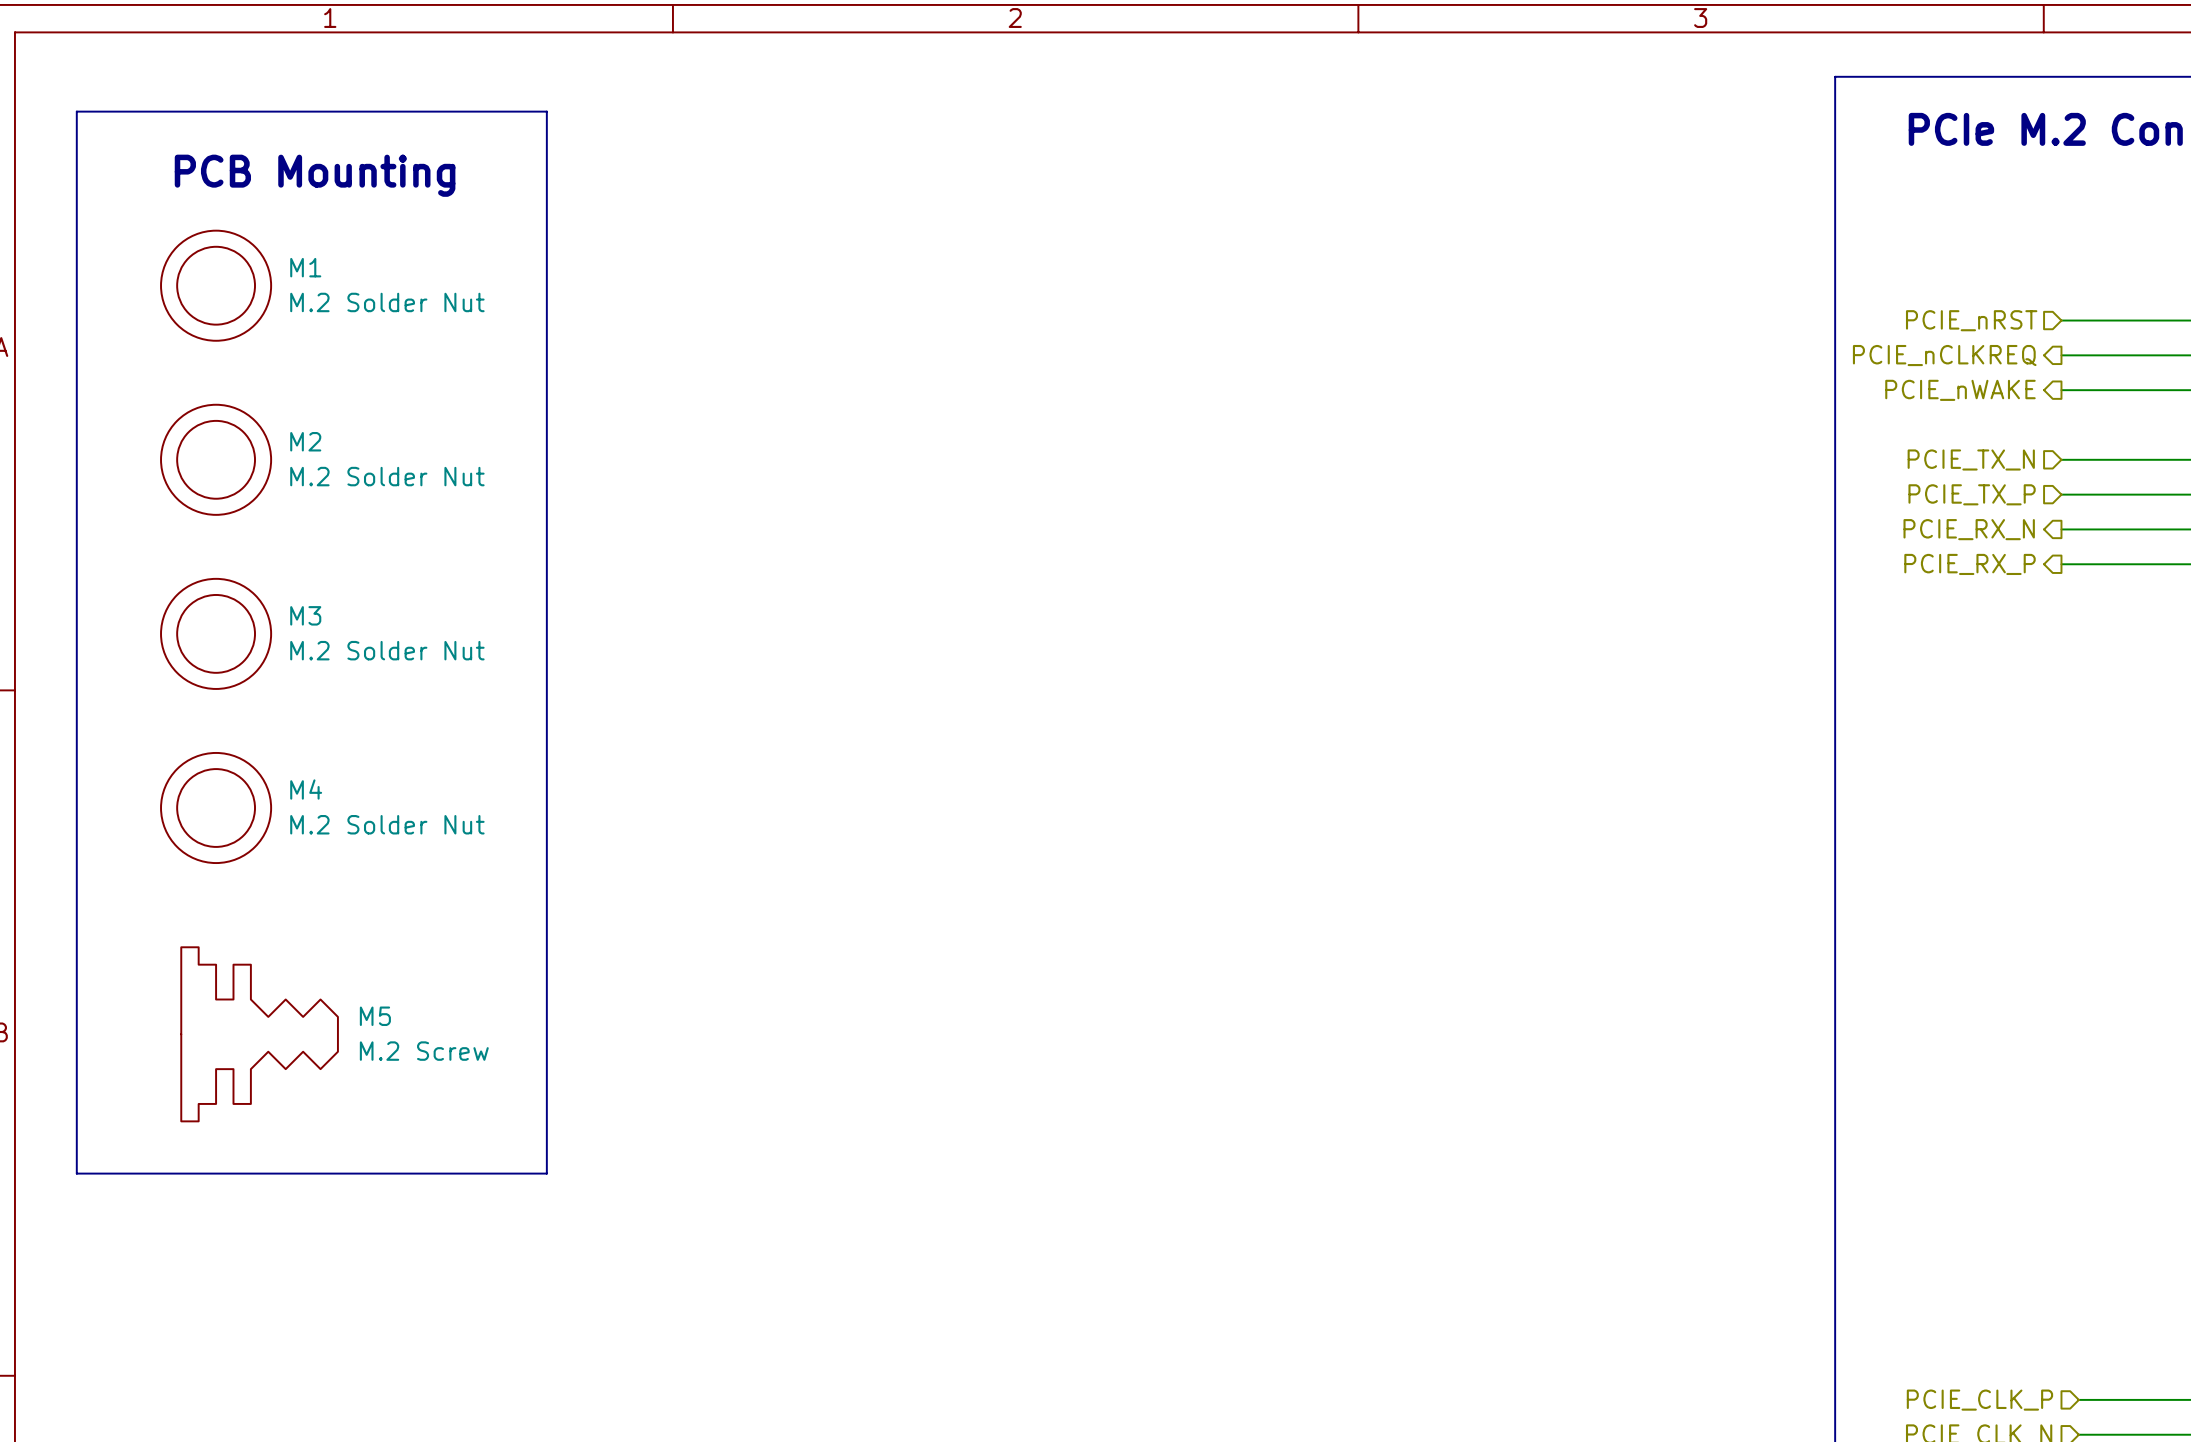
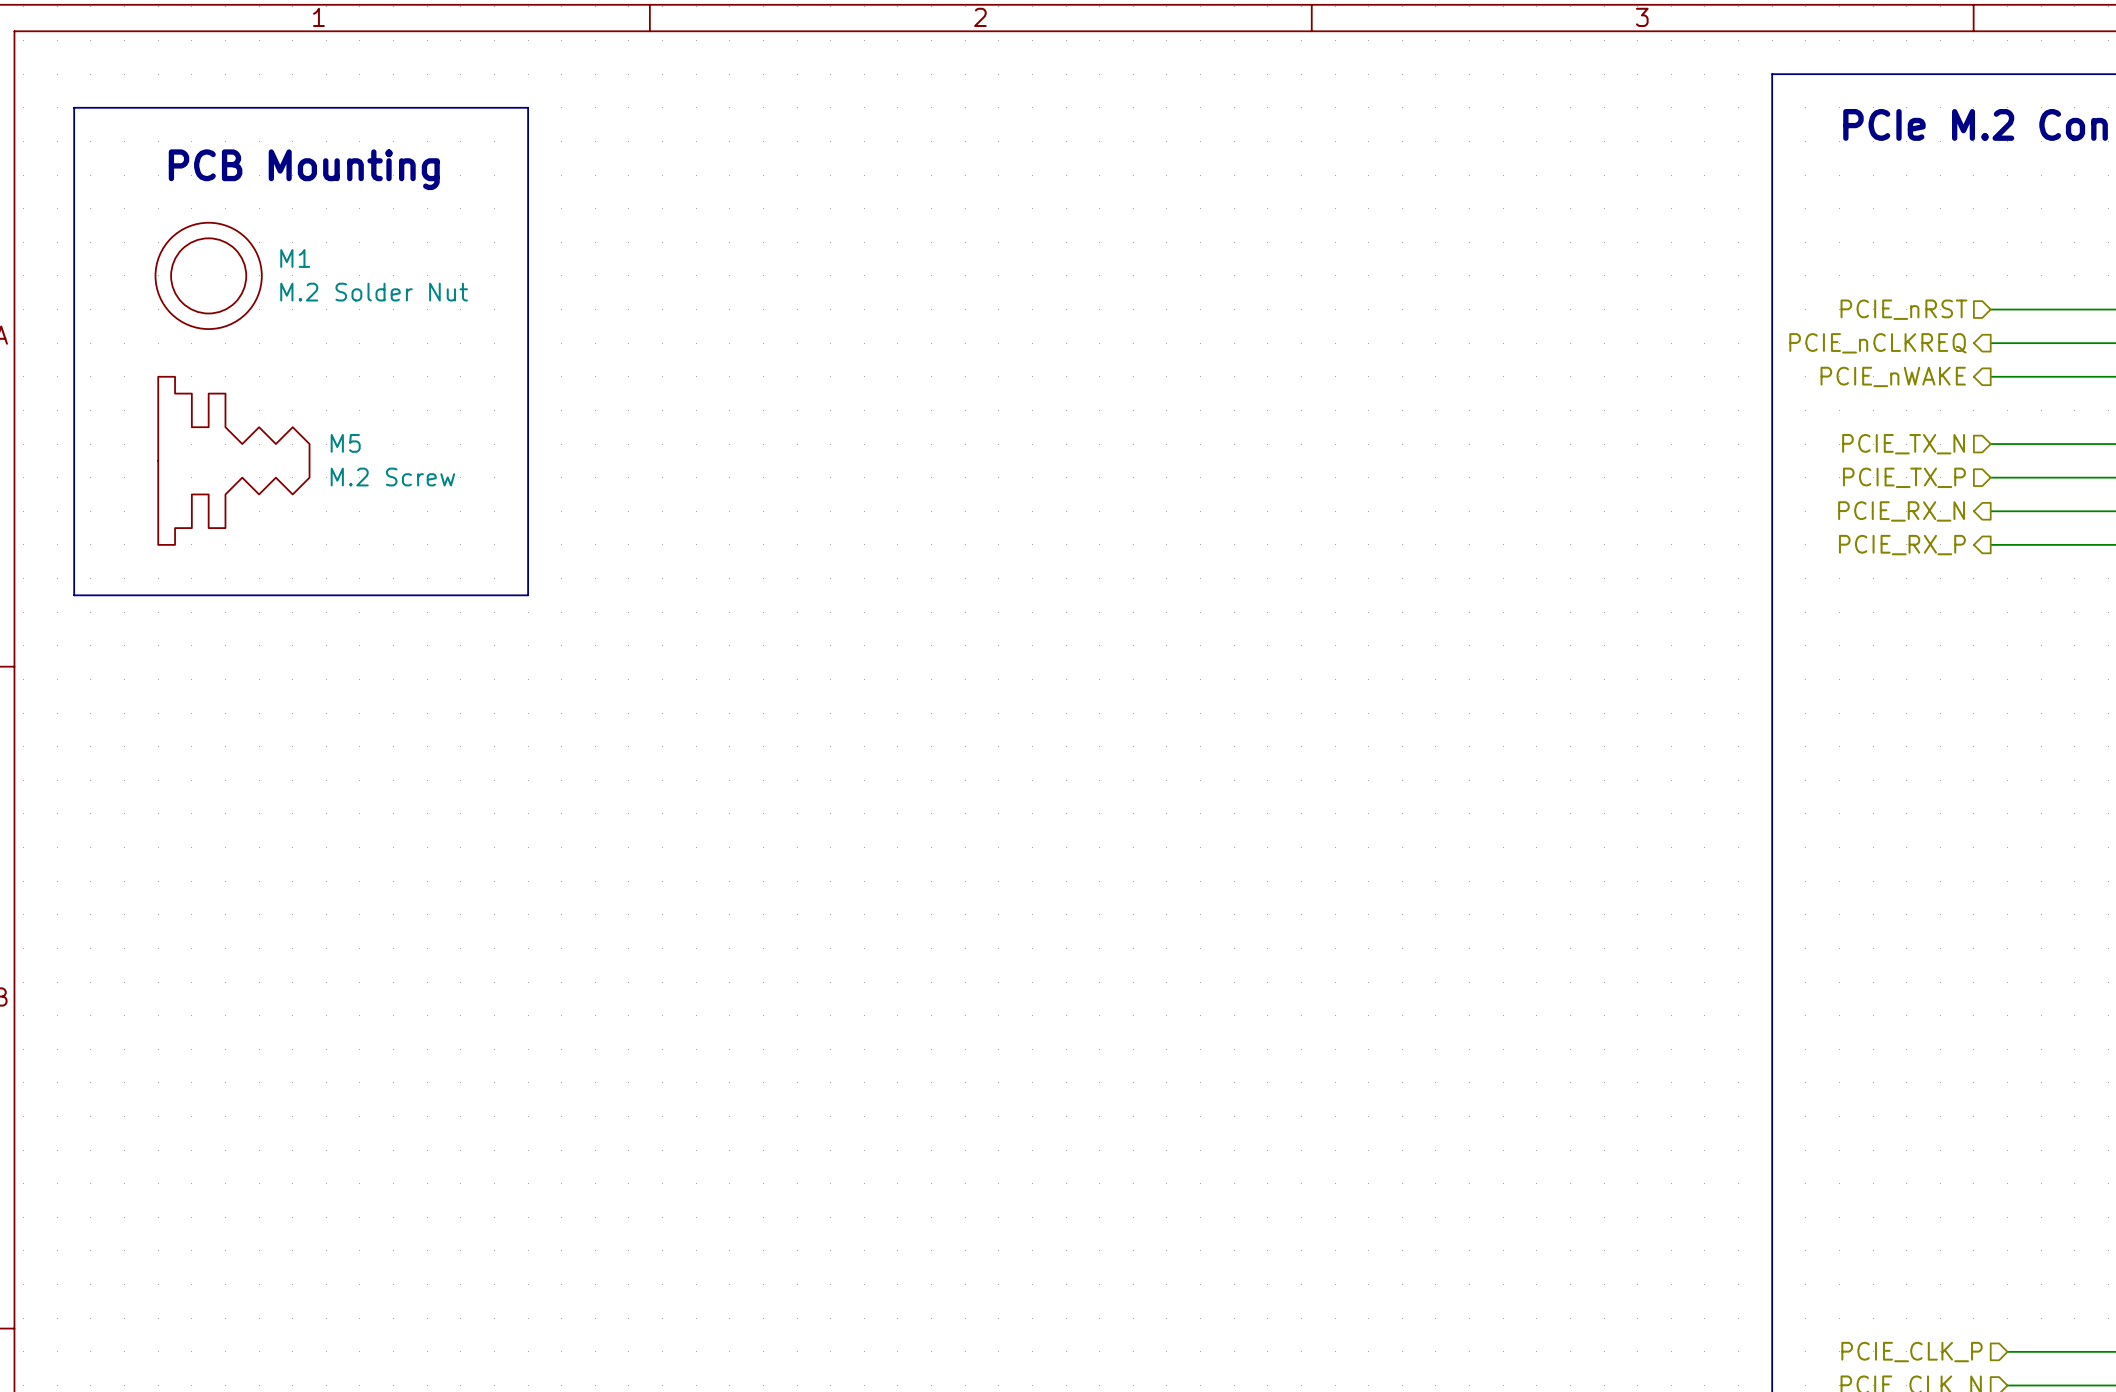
M2: M.2 Solder Nut (216, 459) -> none
line: (76, 616) (76, 1173) (546, 1173) (546, 616) -> (74, 595) (528, 595)
M3: M.2 Solder Nut (216, 633) -> none
M4: M.2 Solder Nut (216, 807) -> none
M5 position: (259, 1034) -> (233, 460)

